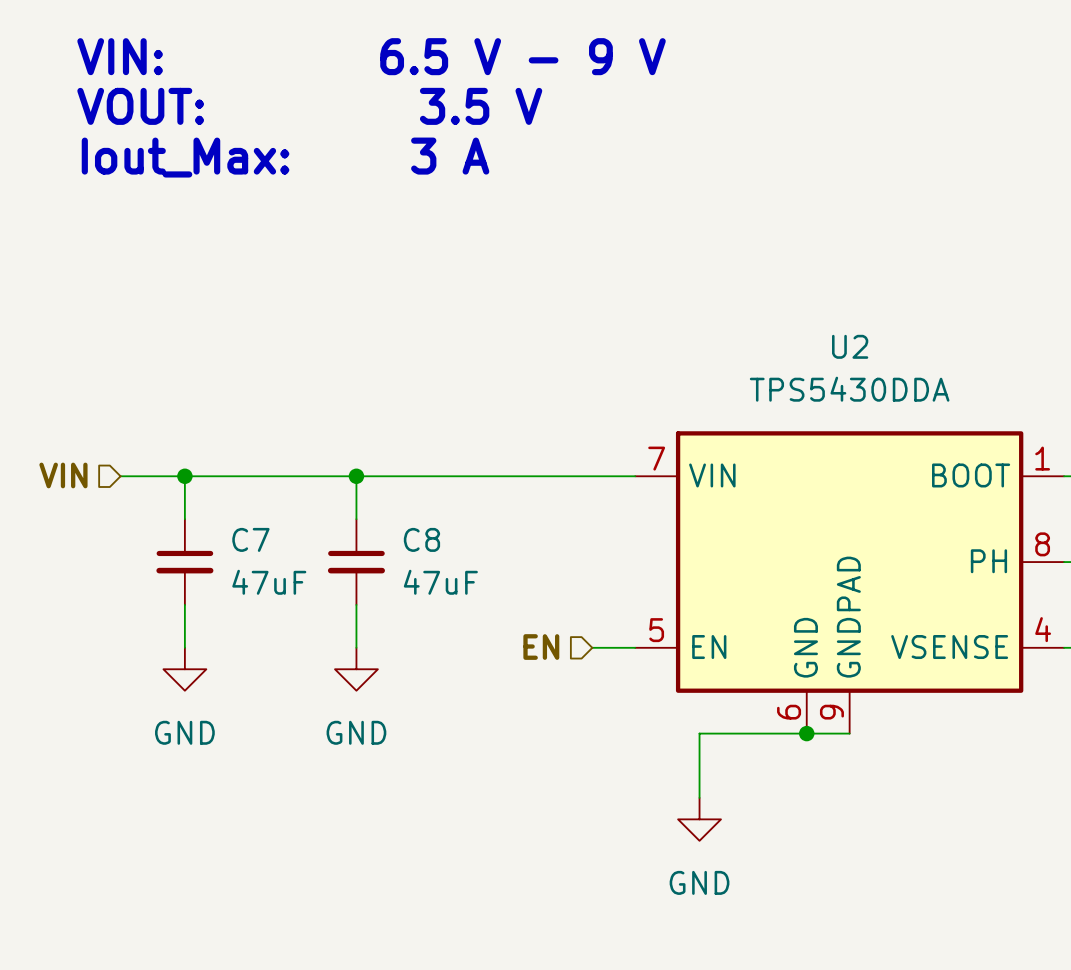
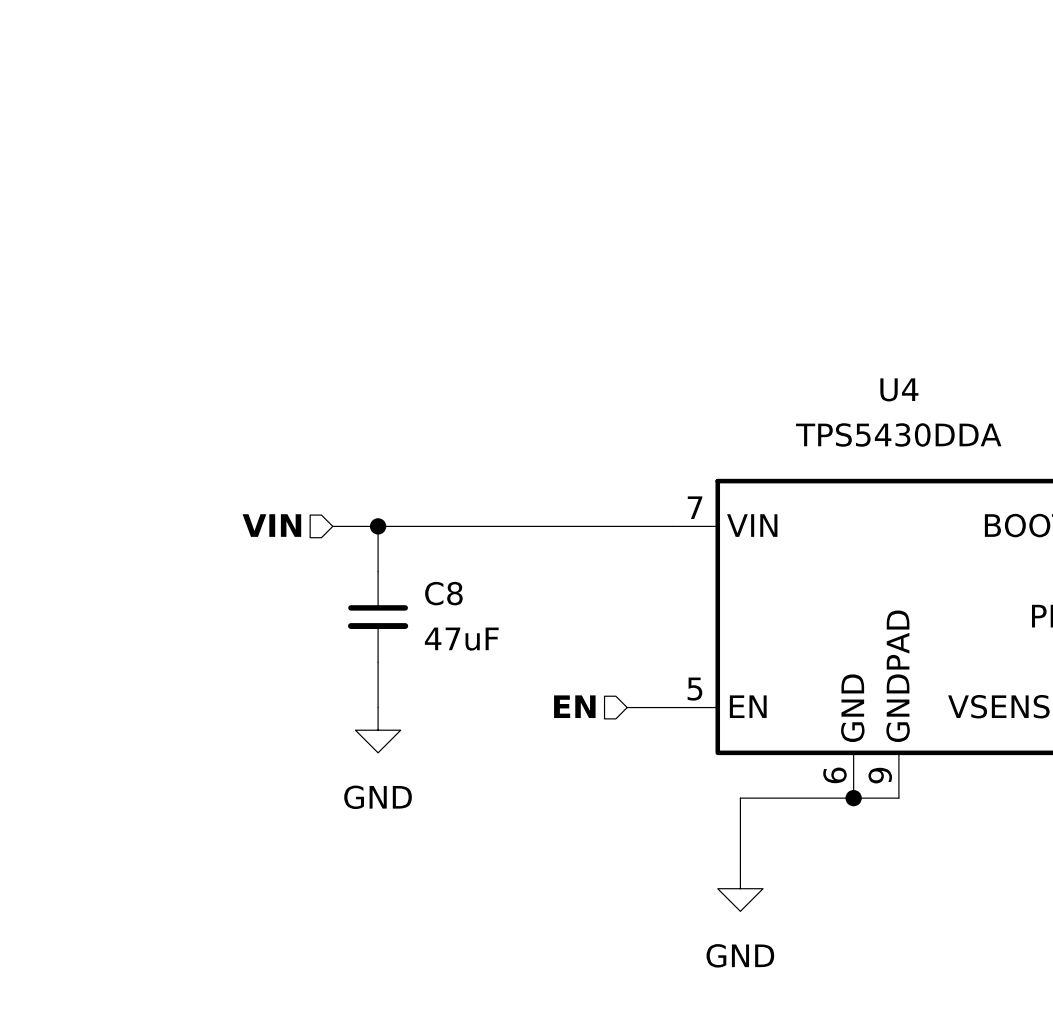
text: VIN: 6.5 V - 9 V (371, 56) -> none
text: VOUT: 3.5 V (309, 106) -> none
text: Iout_Max: 3 A (285, 157) -> none
U2 name: U2 (850, 346) -> U4 (899, 389)
hierarchical label position: VIN (63, 475) -> VIN (271, 525)
wire: (120, 476) (313, 476) -> none
wire: (184, 476) (184, 519) -> none
junction: (184, 476) -> none
C7: 47uF (184, 562) -> none
wire: (184, 604) (184, 647) -> none
power symbol: GND (184, 669) -> none

